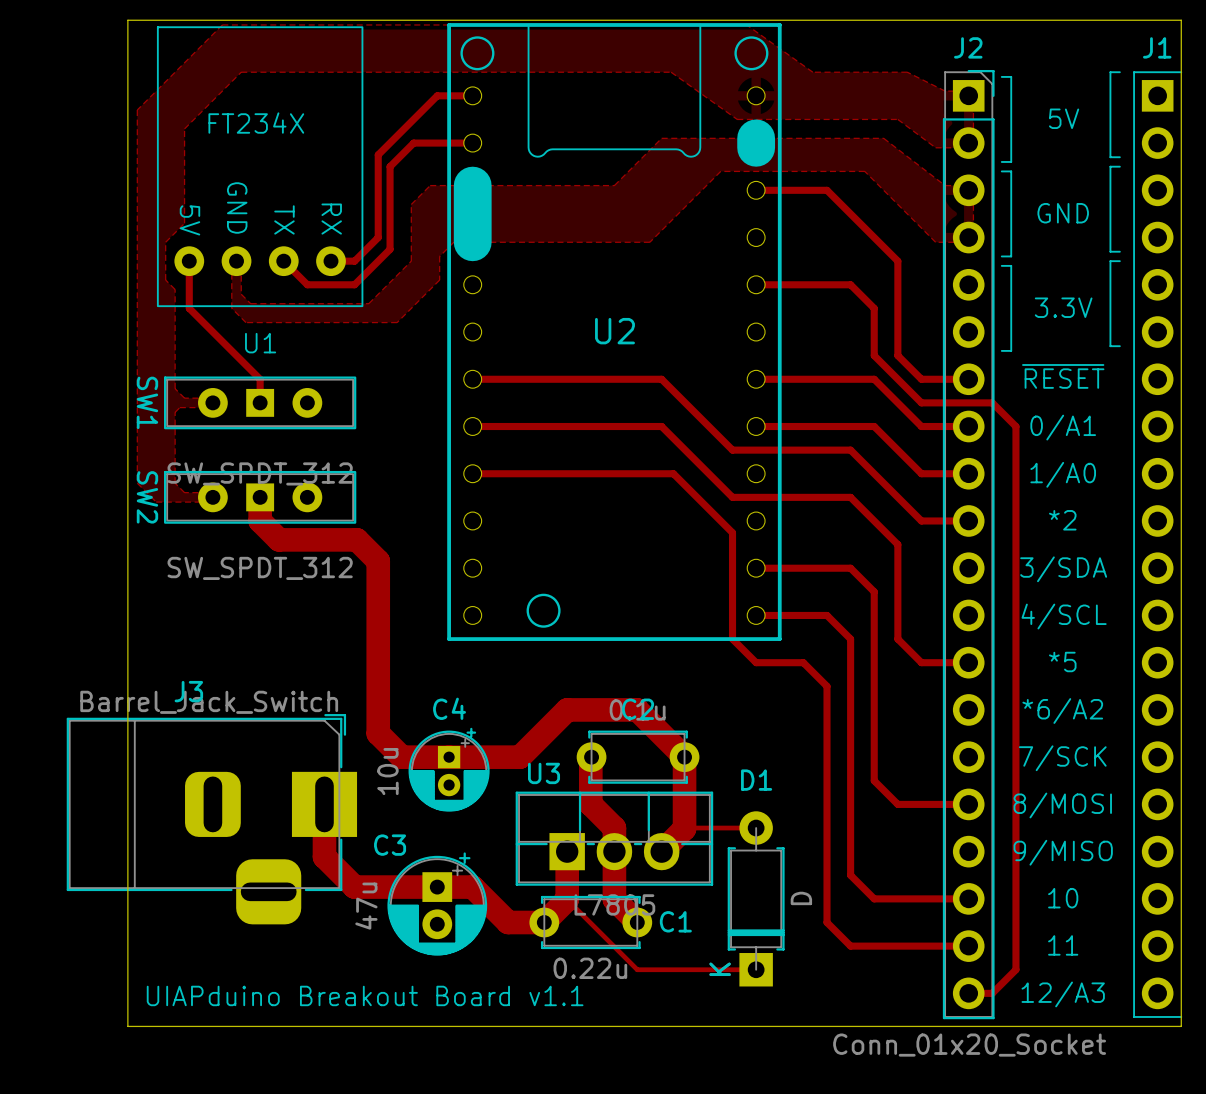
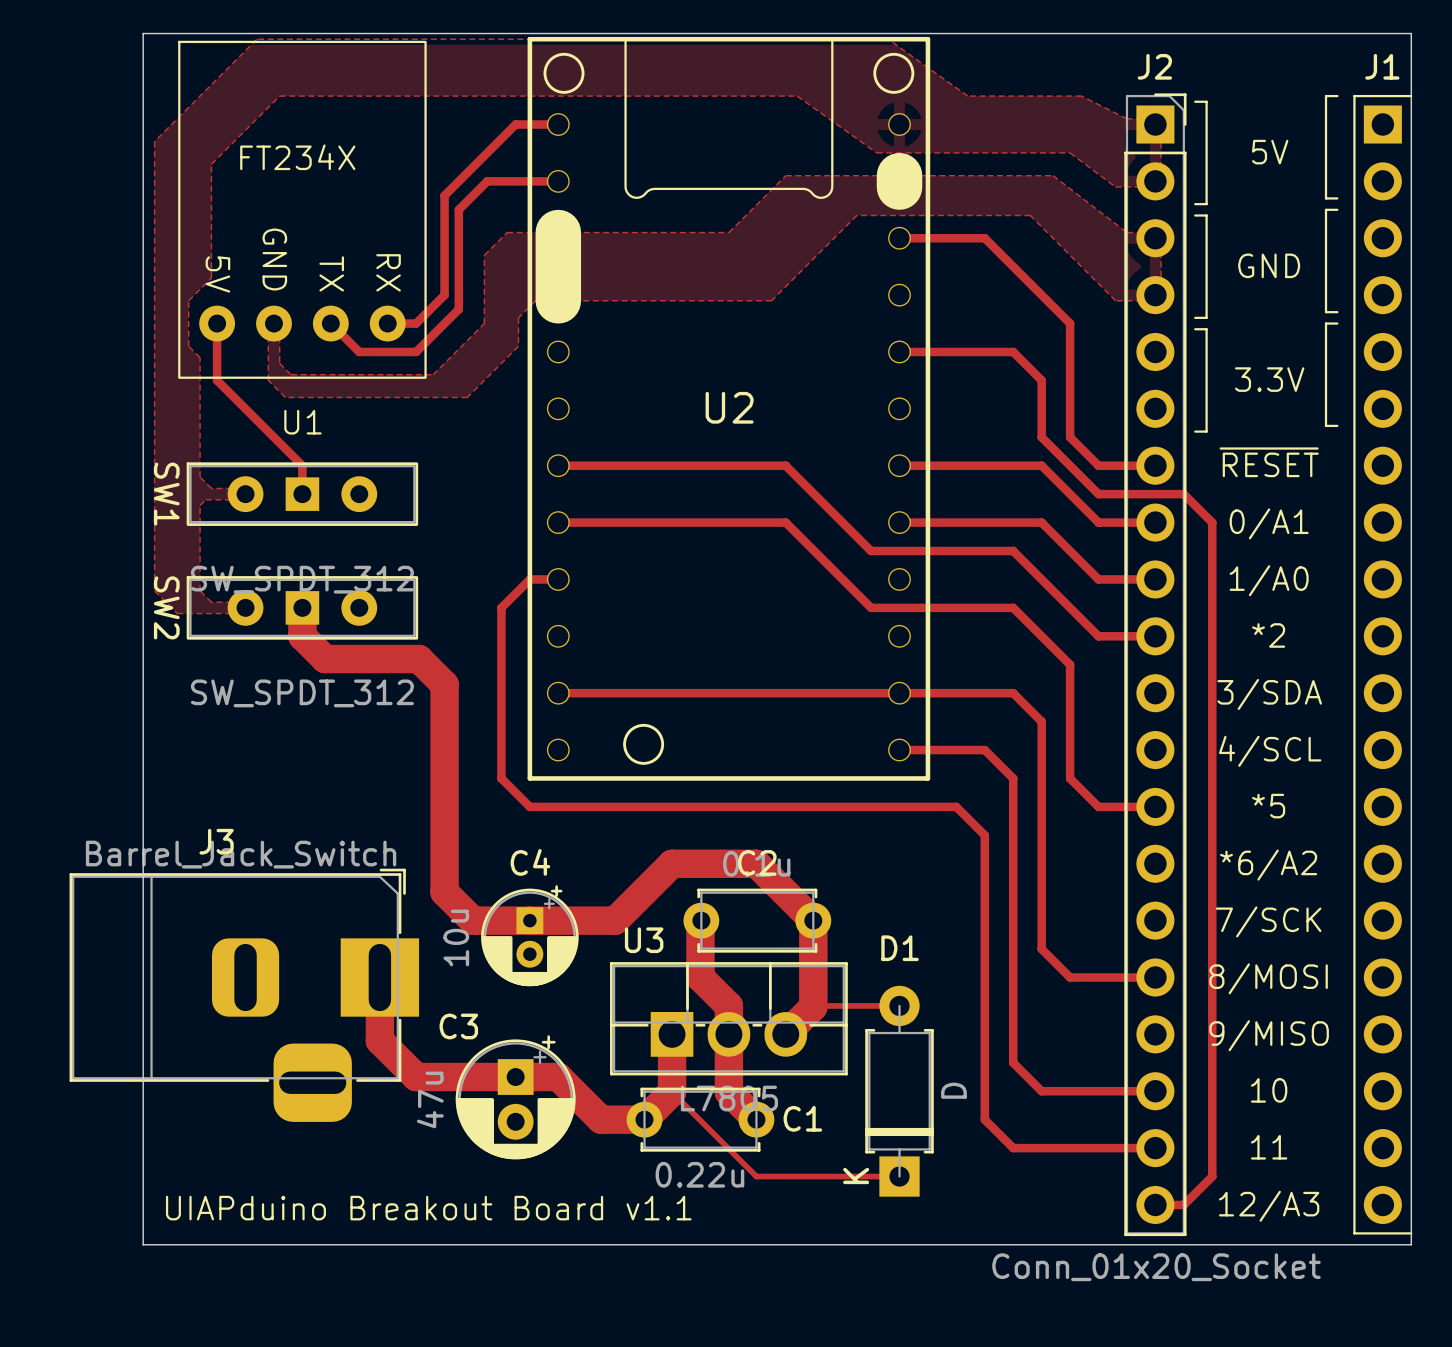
track: (472, 473) (673, 473) (732, 532) (732, 639) (756, 662) -> (558, 579) (529, 579) (501, 607) (501, 778) (529, 806) (899, 806)
track: none -> (558, 693) (899, 693)

